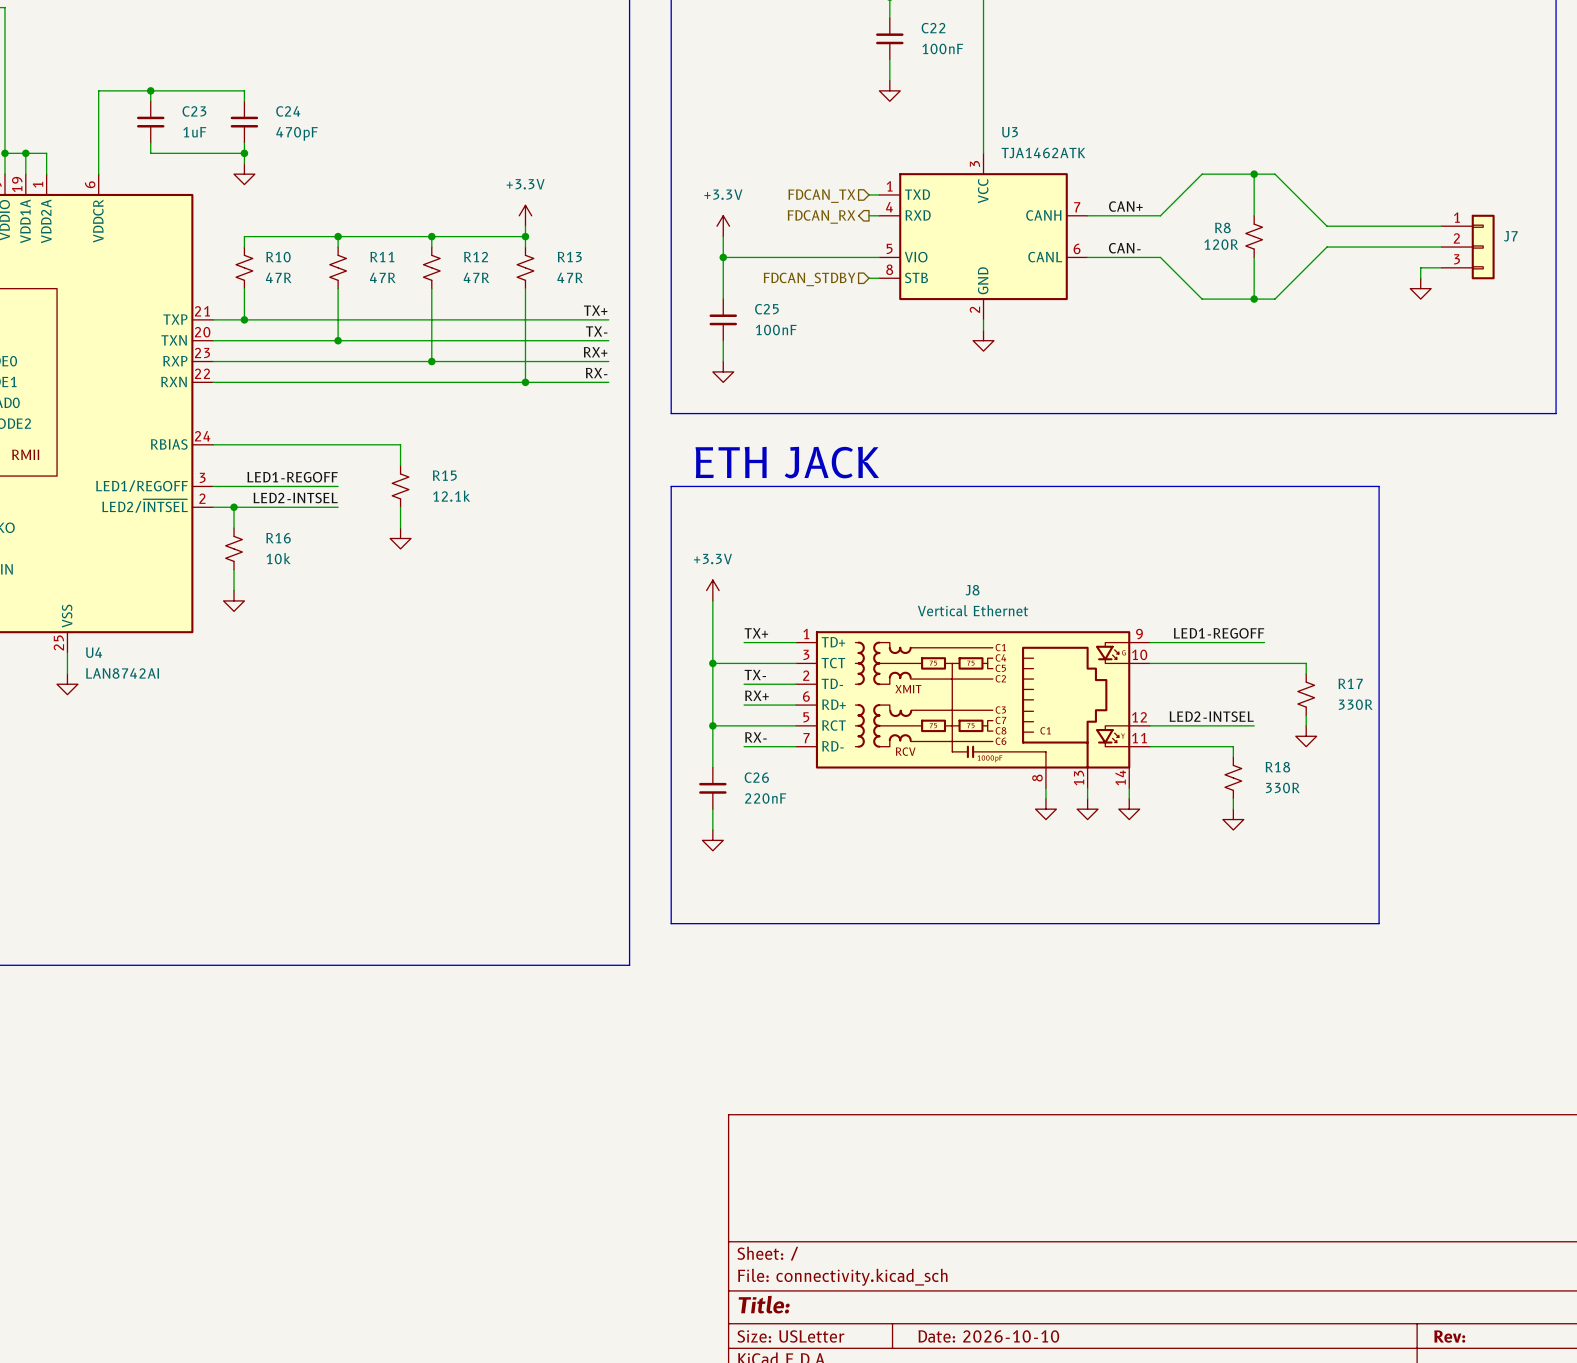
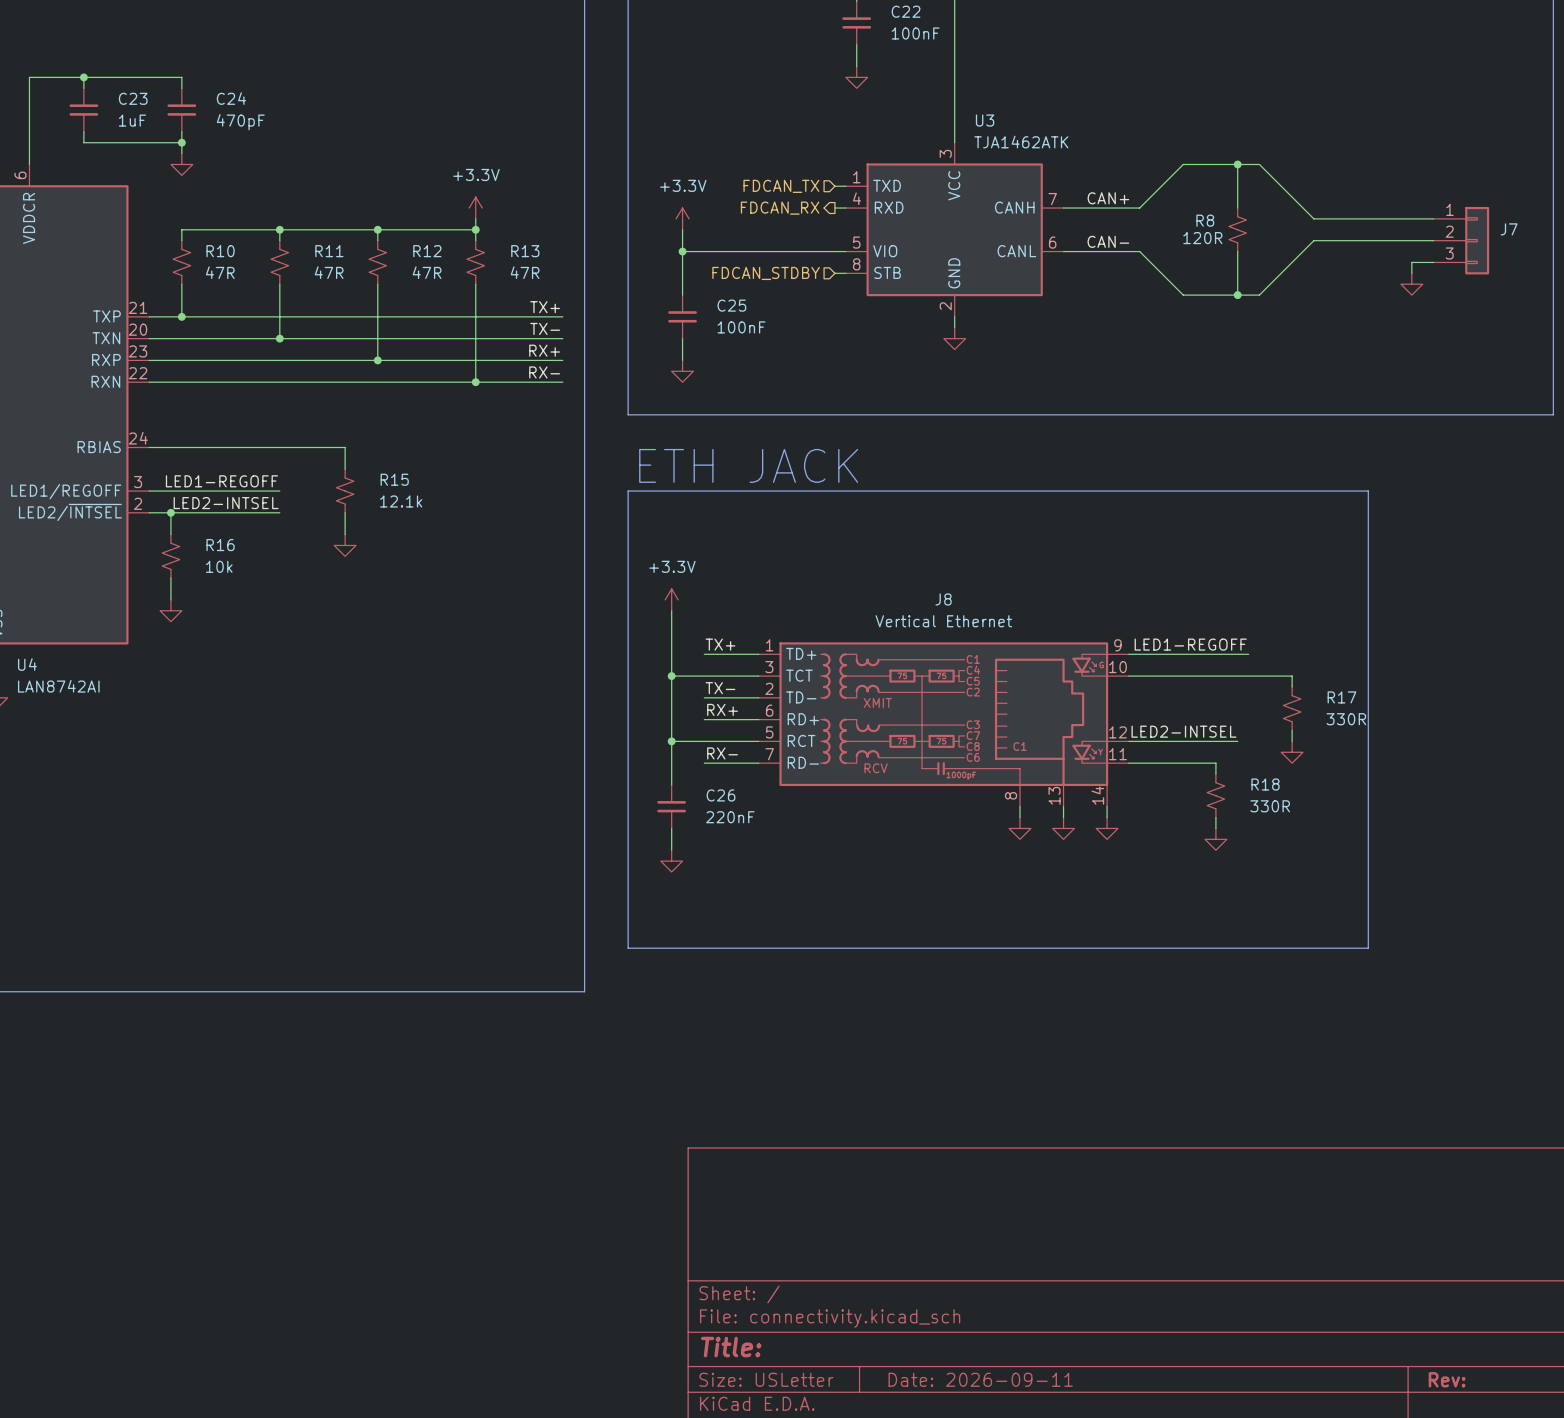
title block: Date: 2026-10-10 (988, 1336) -> Date: 2026-09-11 (980, 1379)

